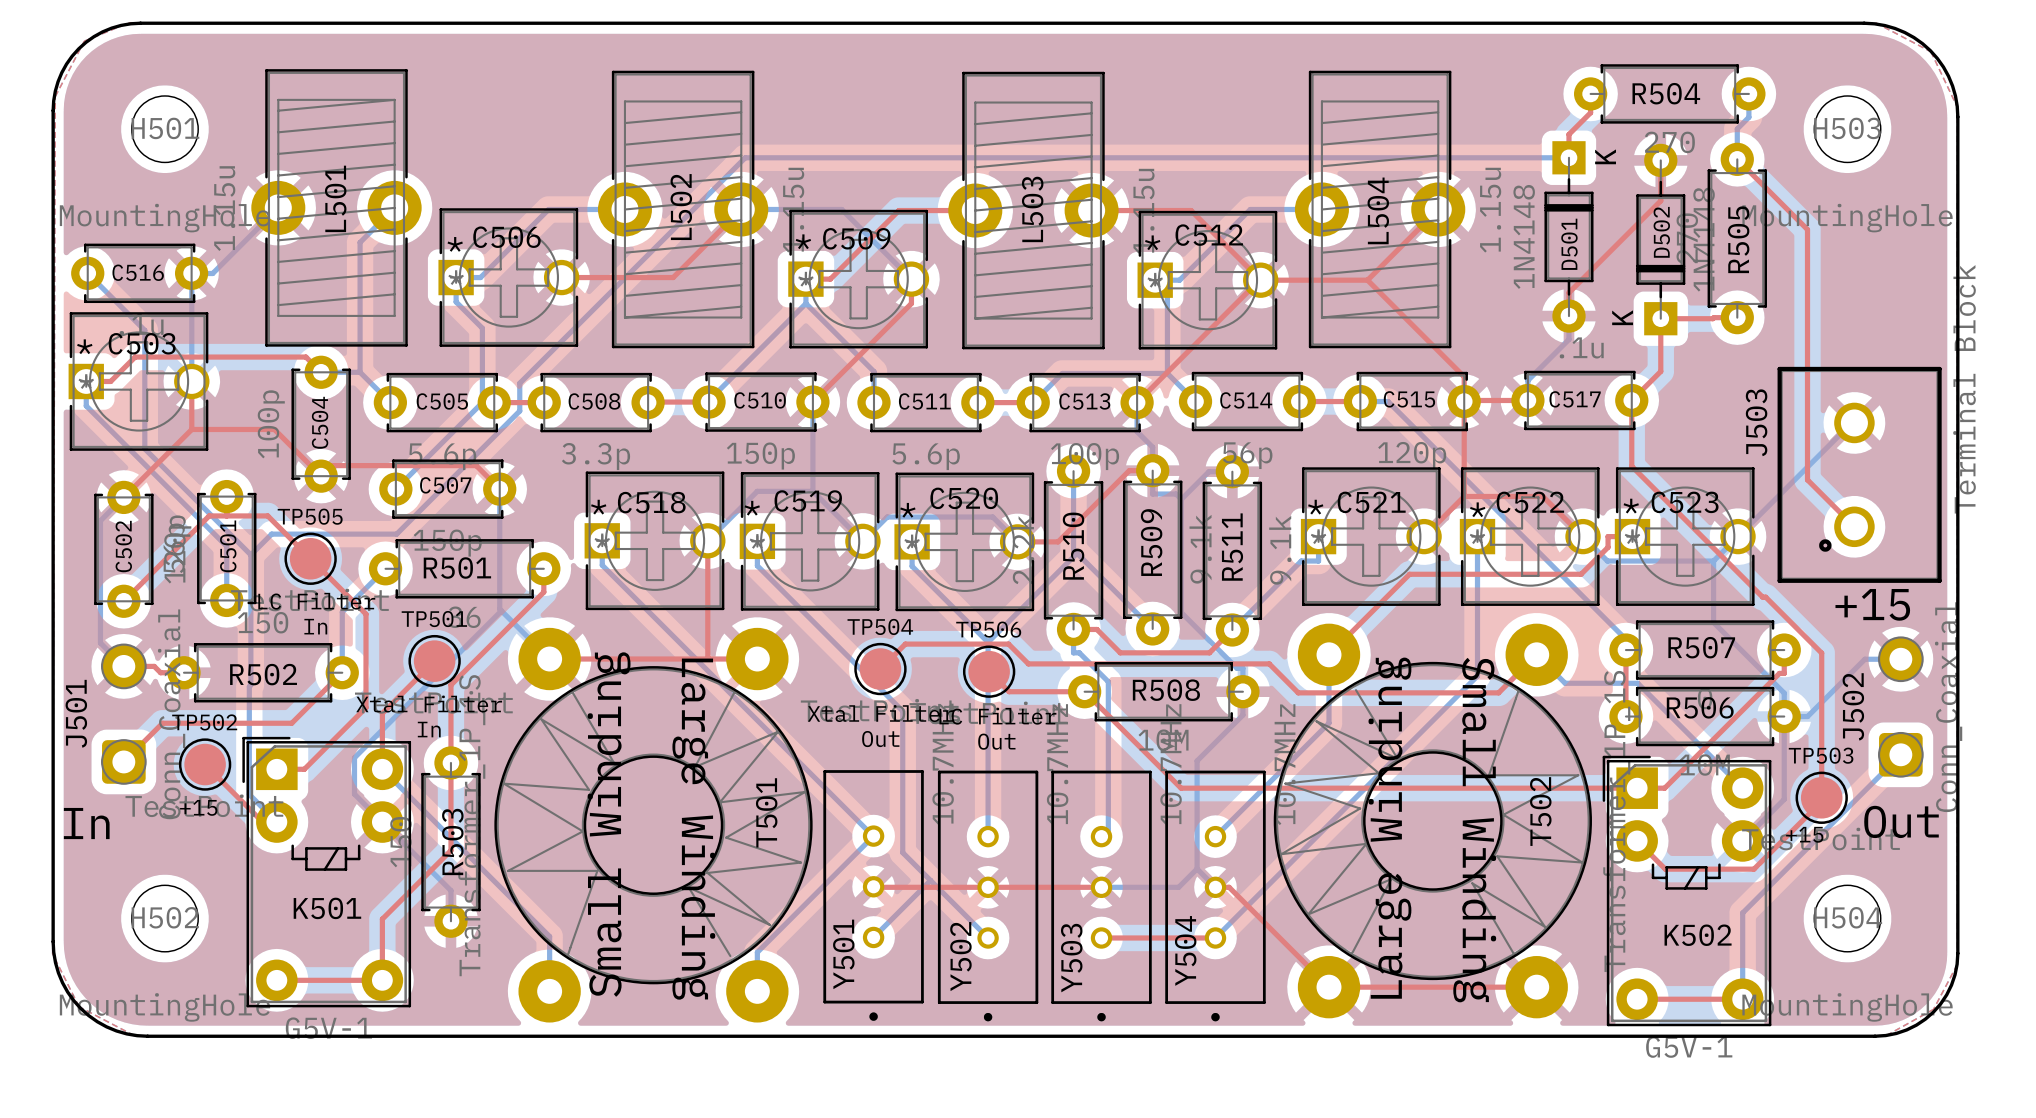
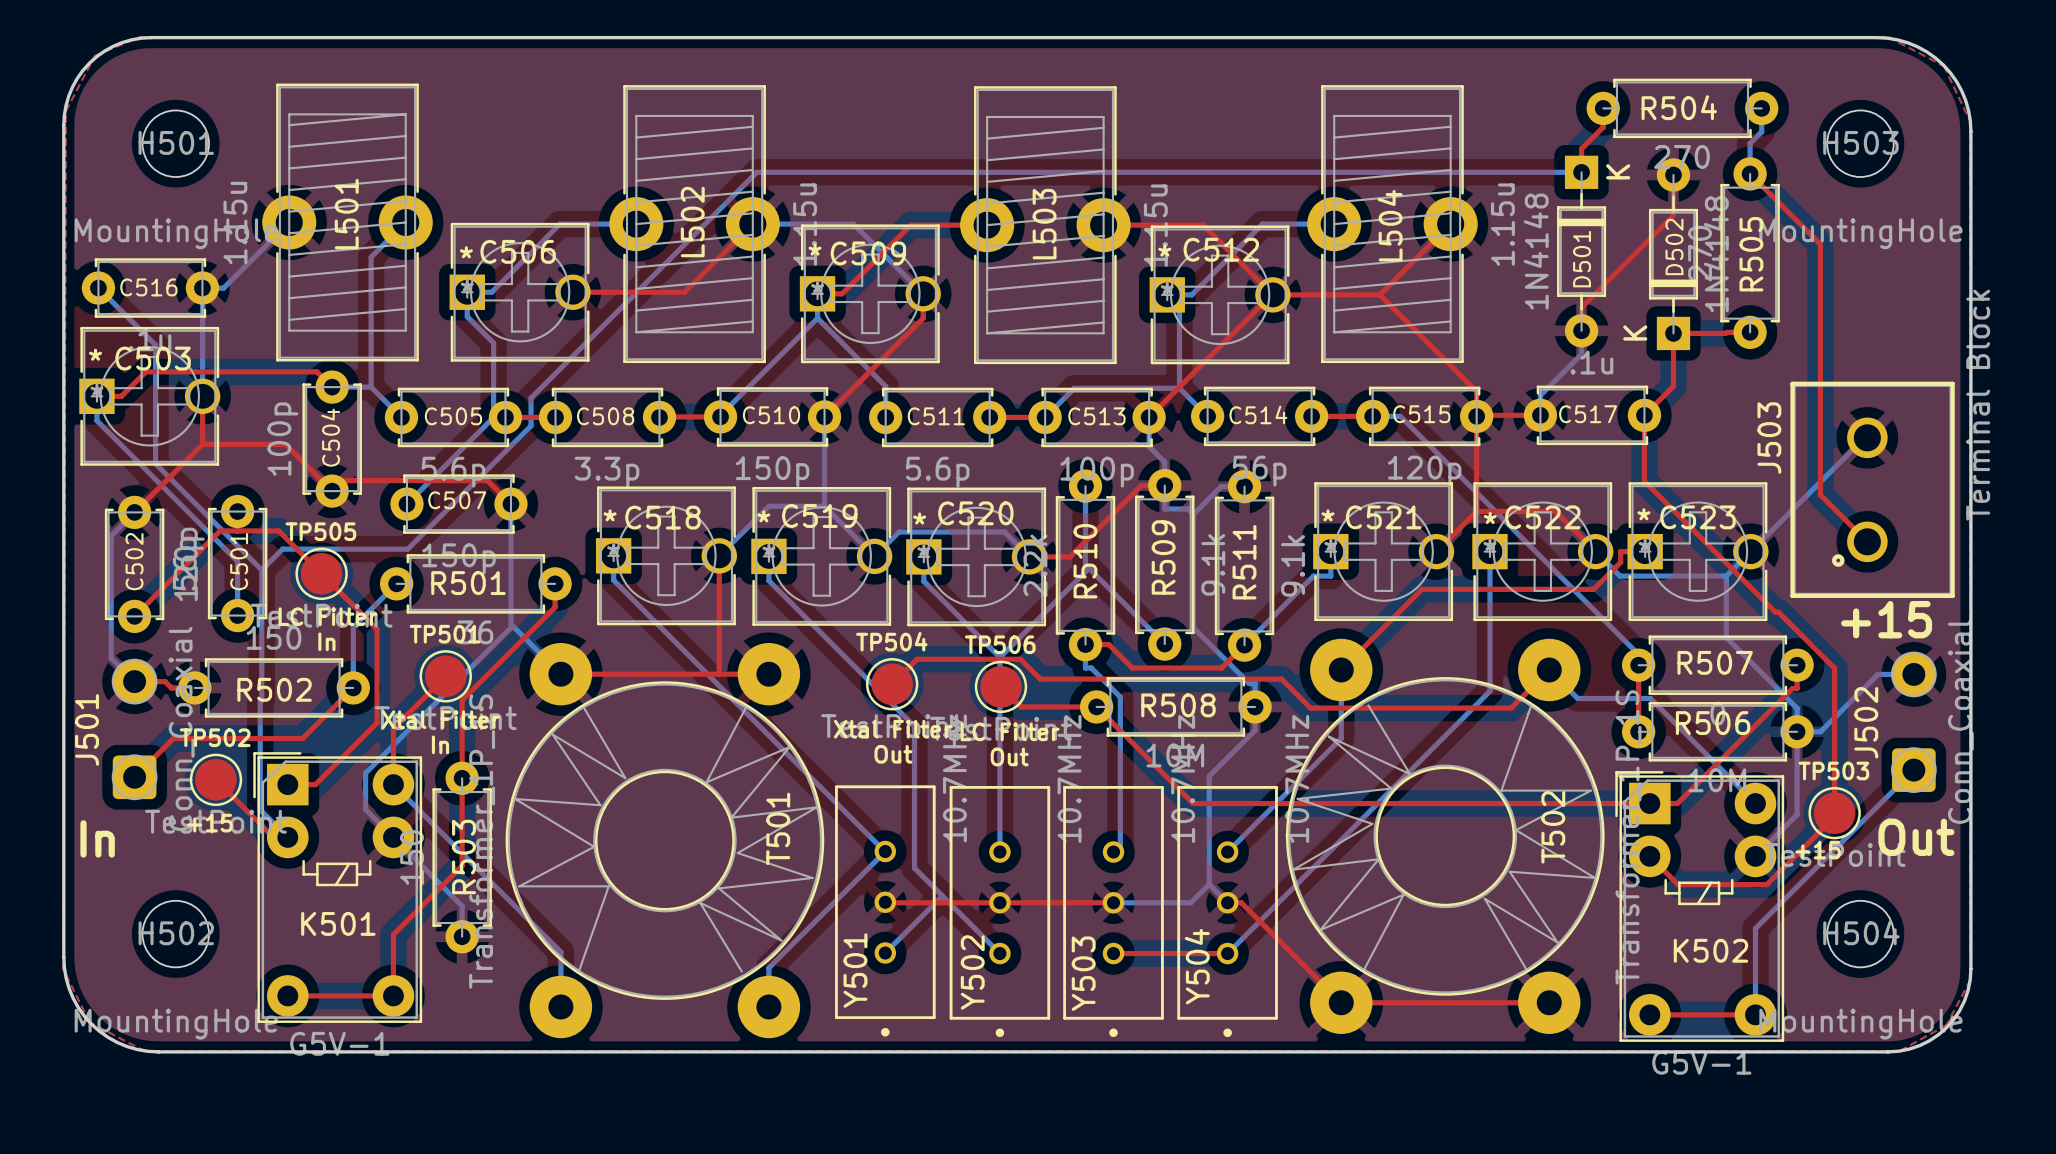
text: Small Winding (609, 824) -> none
text: Large Winding (1389, 828) -> none
text: Large Winding (693, 829) -> none
text: Small Winding (1474, 830) -> none

